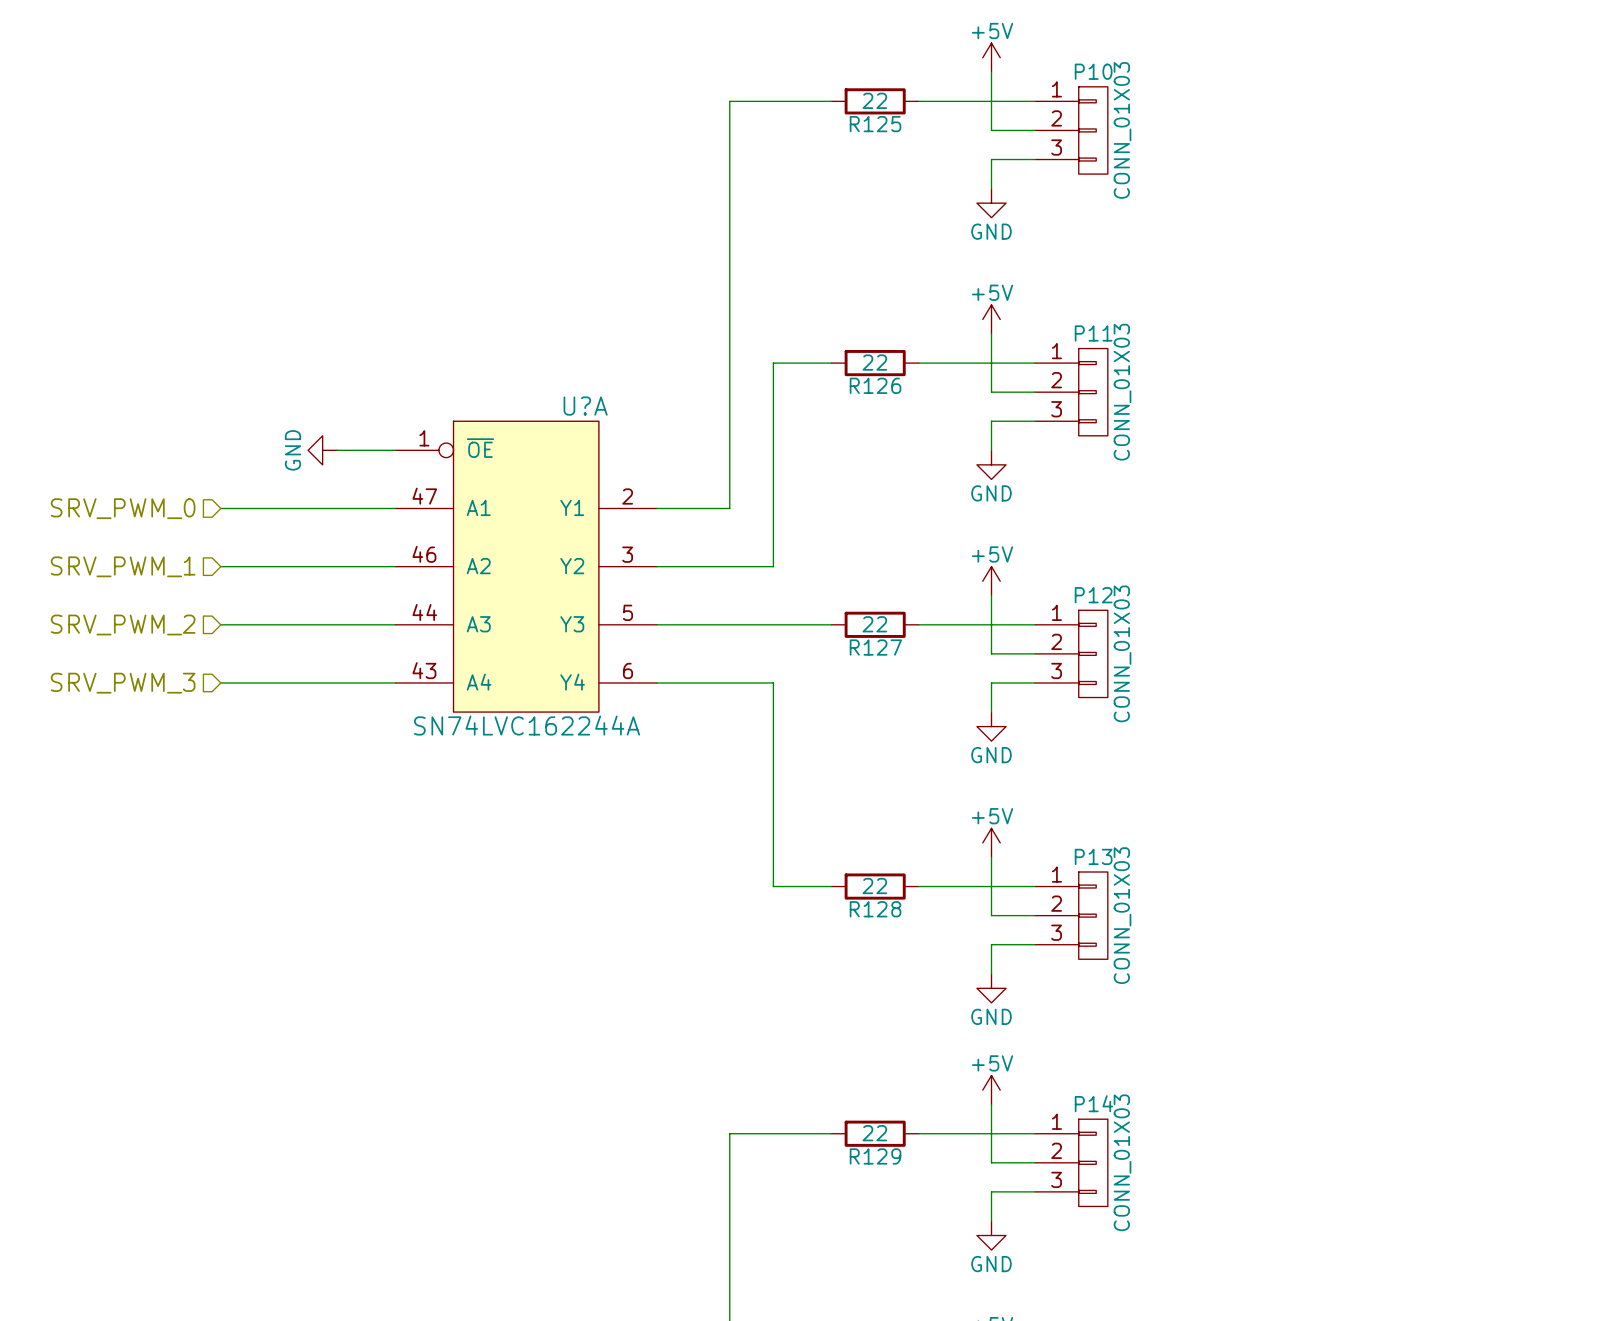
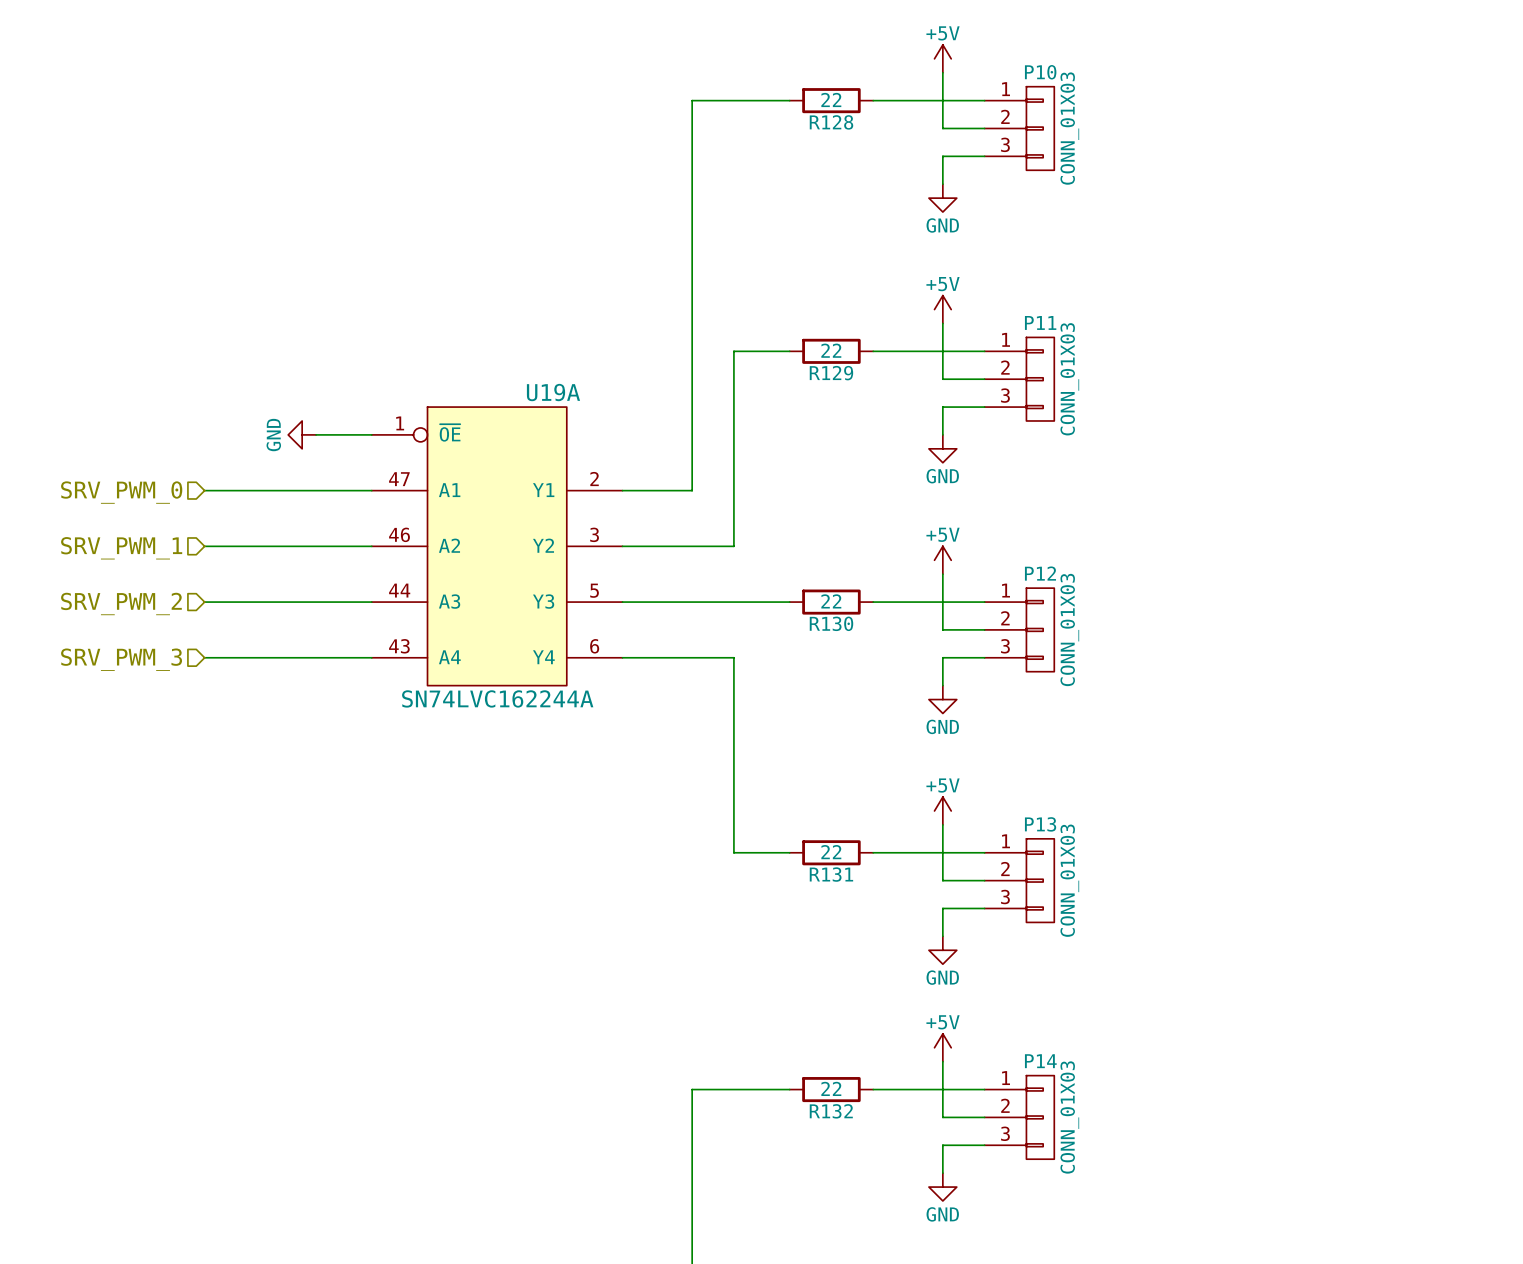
R125 name: R125 (875, 124) -> R128 (831, 122)
R126 name: R126 (875, 385) -> R129 (831, 373)
U?A name: U?A (585, 406) -> U19A (553, 392)
R127 name: R127 (875, 647) -> R130 (831, 623)
R128 name: R128 (875, 909) -> R131 (831, 874)
R129 name: R129 (875, 1156) -> R132 (831, 1111)

